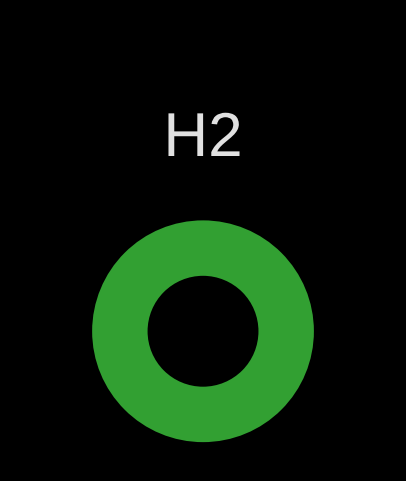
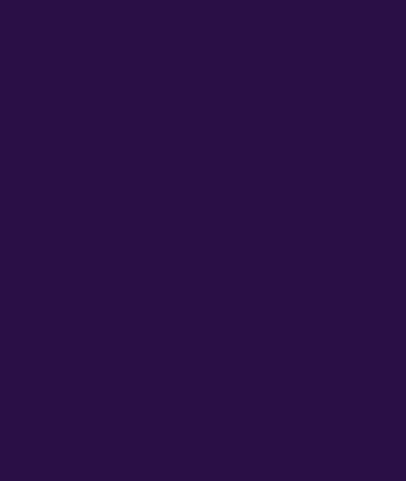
H2: (203, 331) -> none

